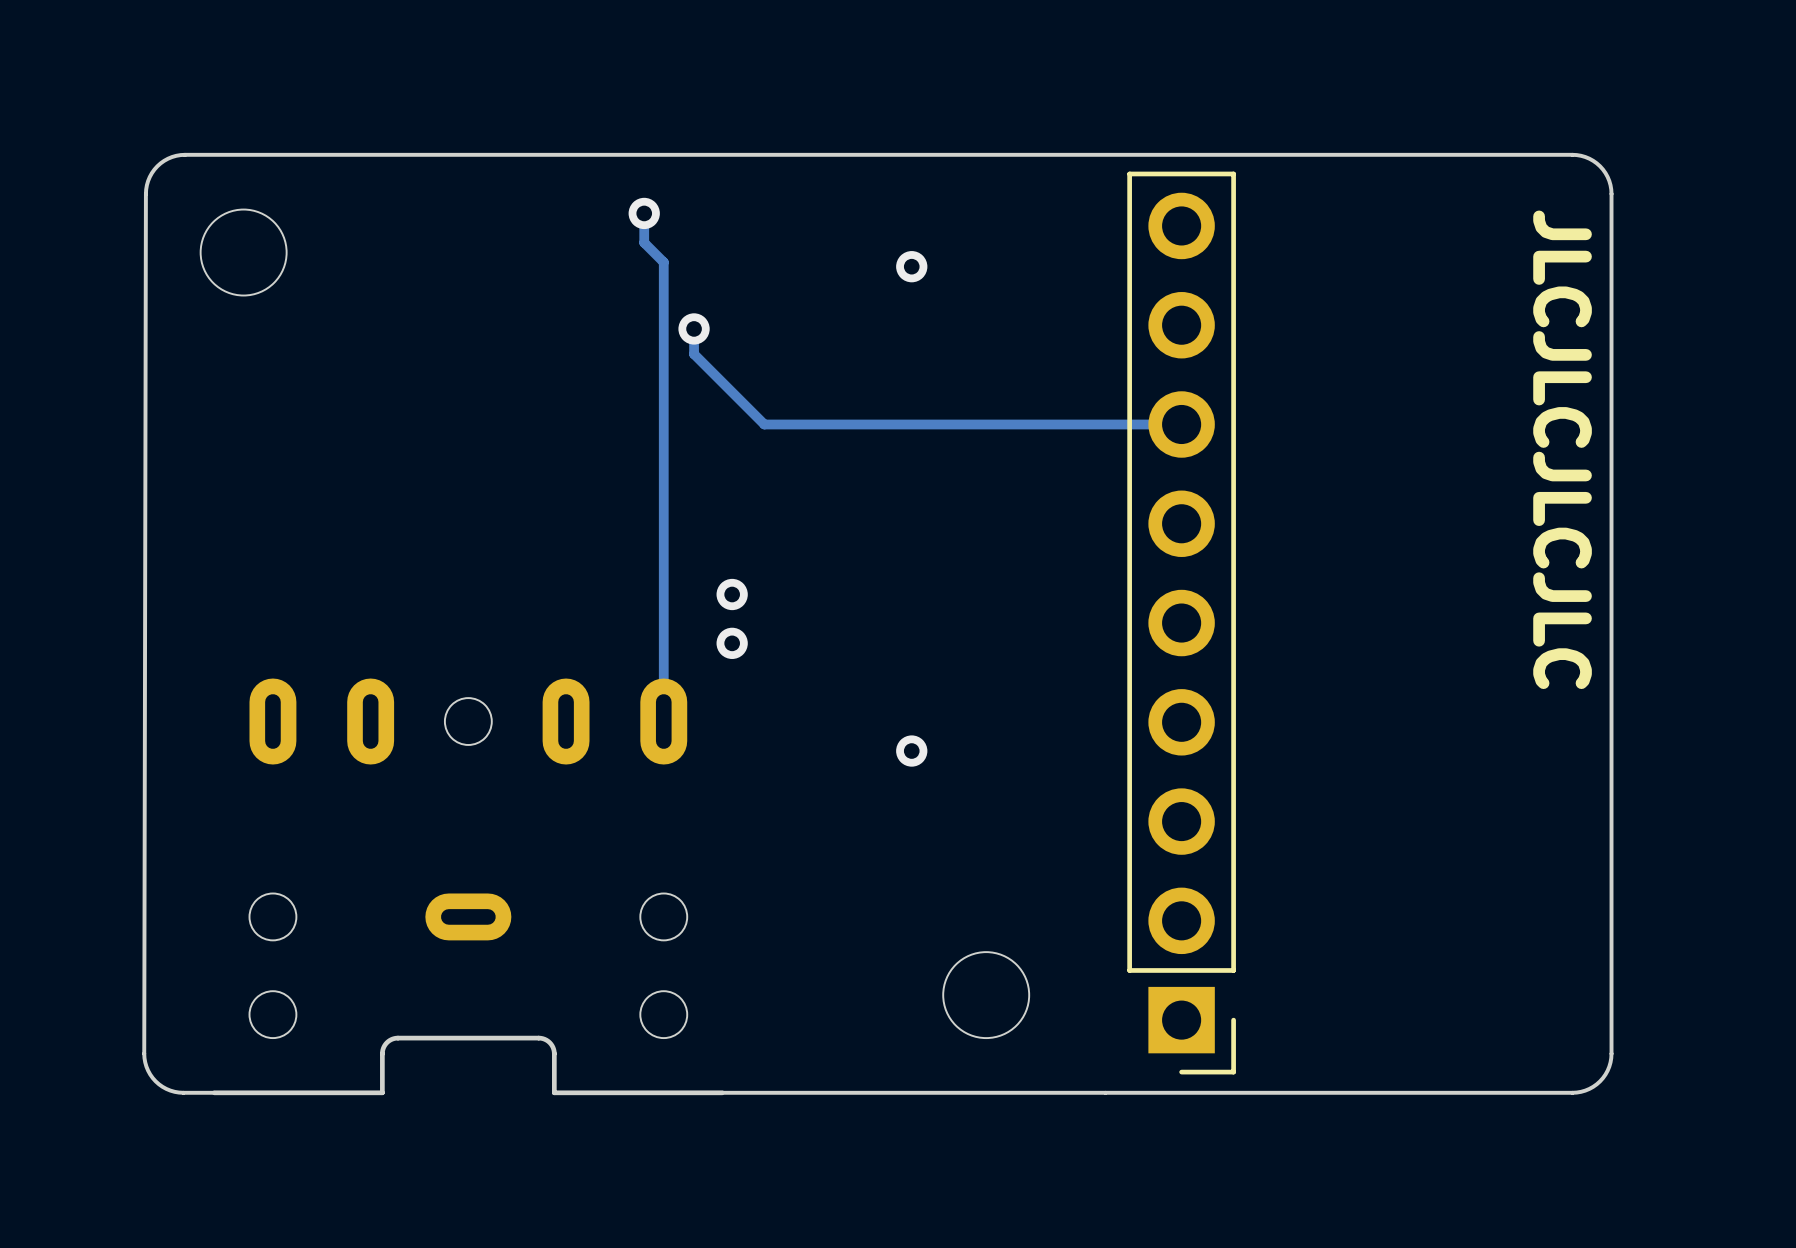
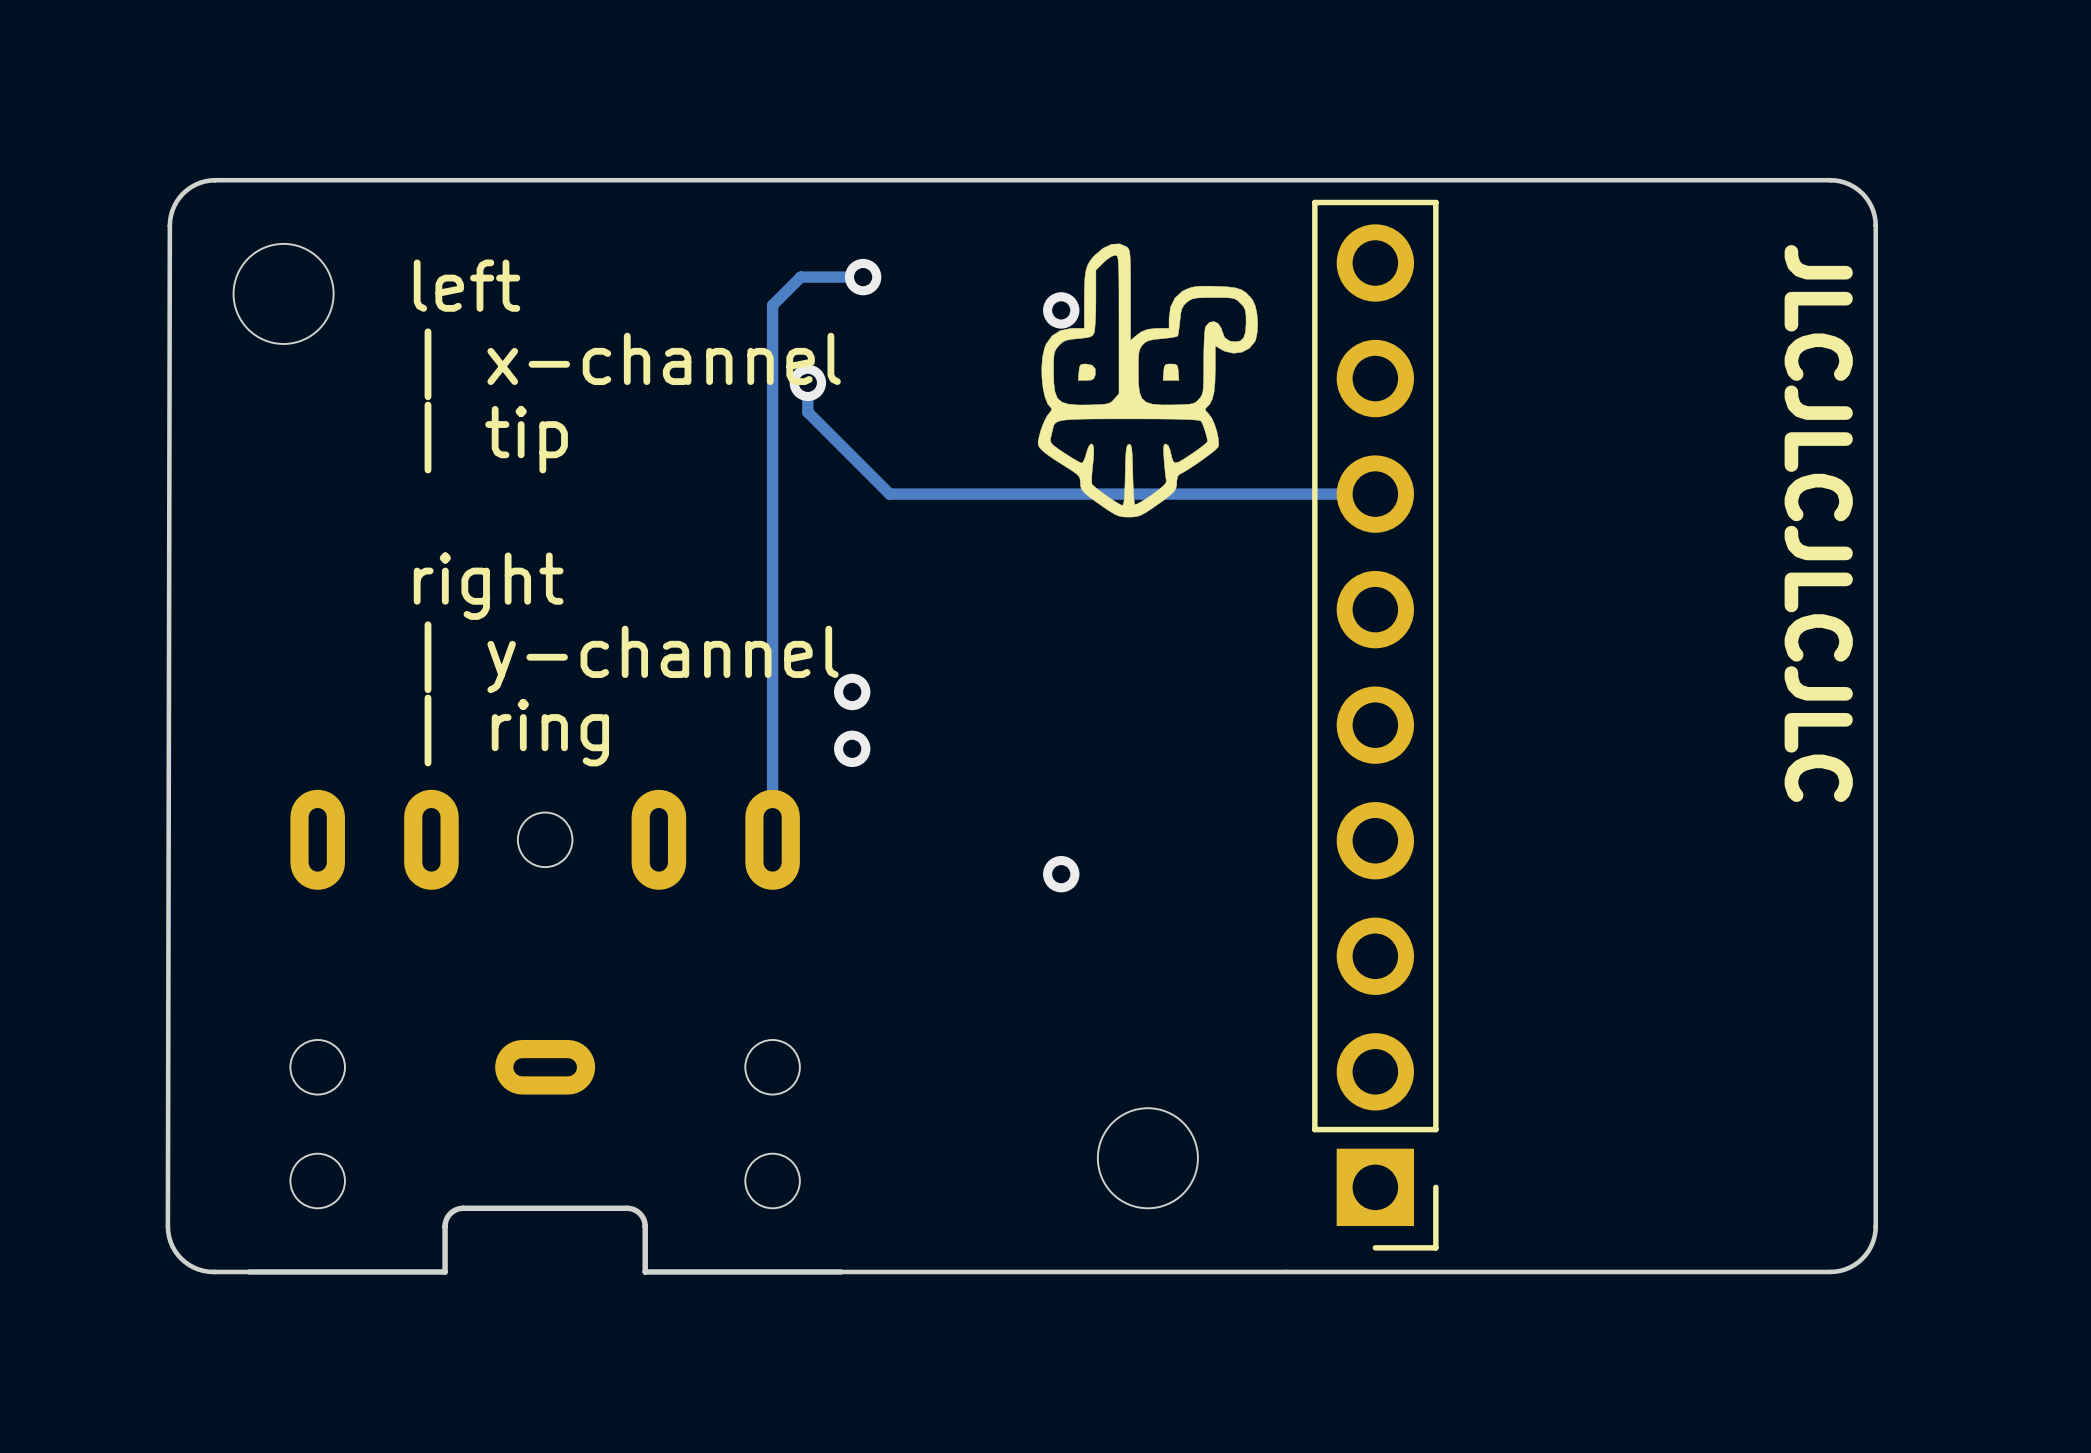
drawing: none -> [1037, 243, 1258, 518]
track: (644, 213) (644, 242) (663, 262) -> (863, 277) (800, 277) (772, 305)
via position: (644, 213) -> (863, 277)
text: none -> left (466, 285)
text: none -> | x-channel (632, 364)
text: none -> | tip (496, 437)
text: none -> right (488, 586)
text: none -> | y-channel (631, 657)
text: none -> | ring (516, 730)

